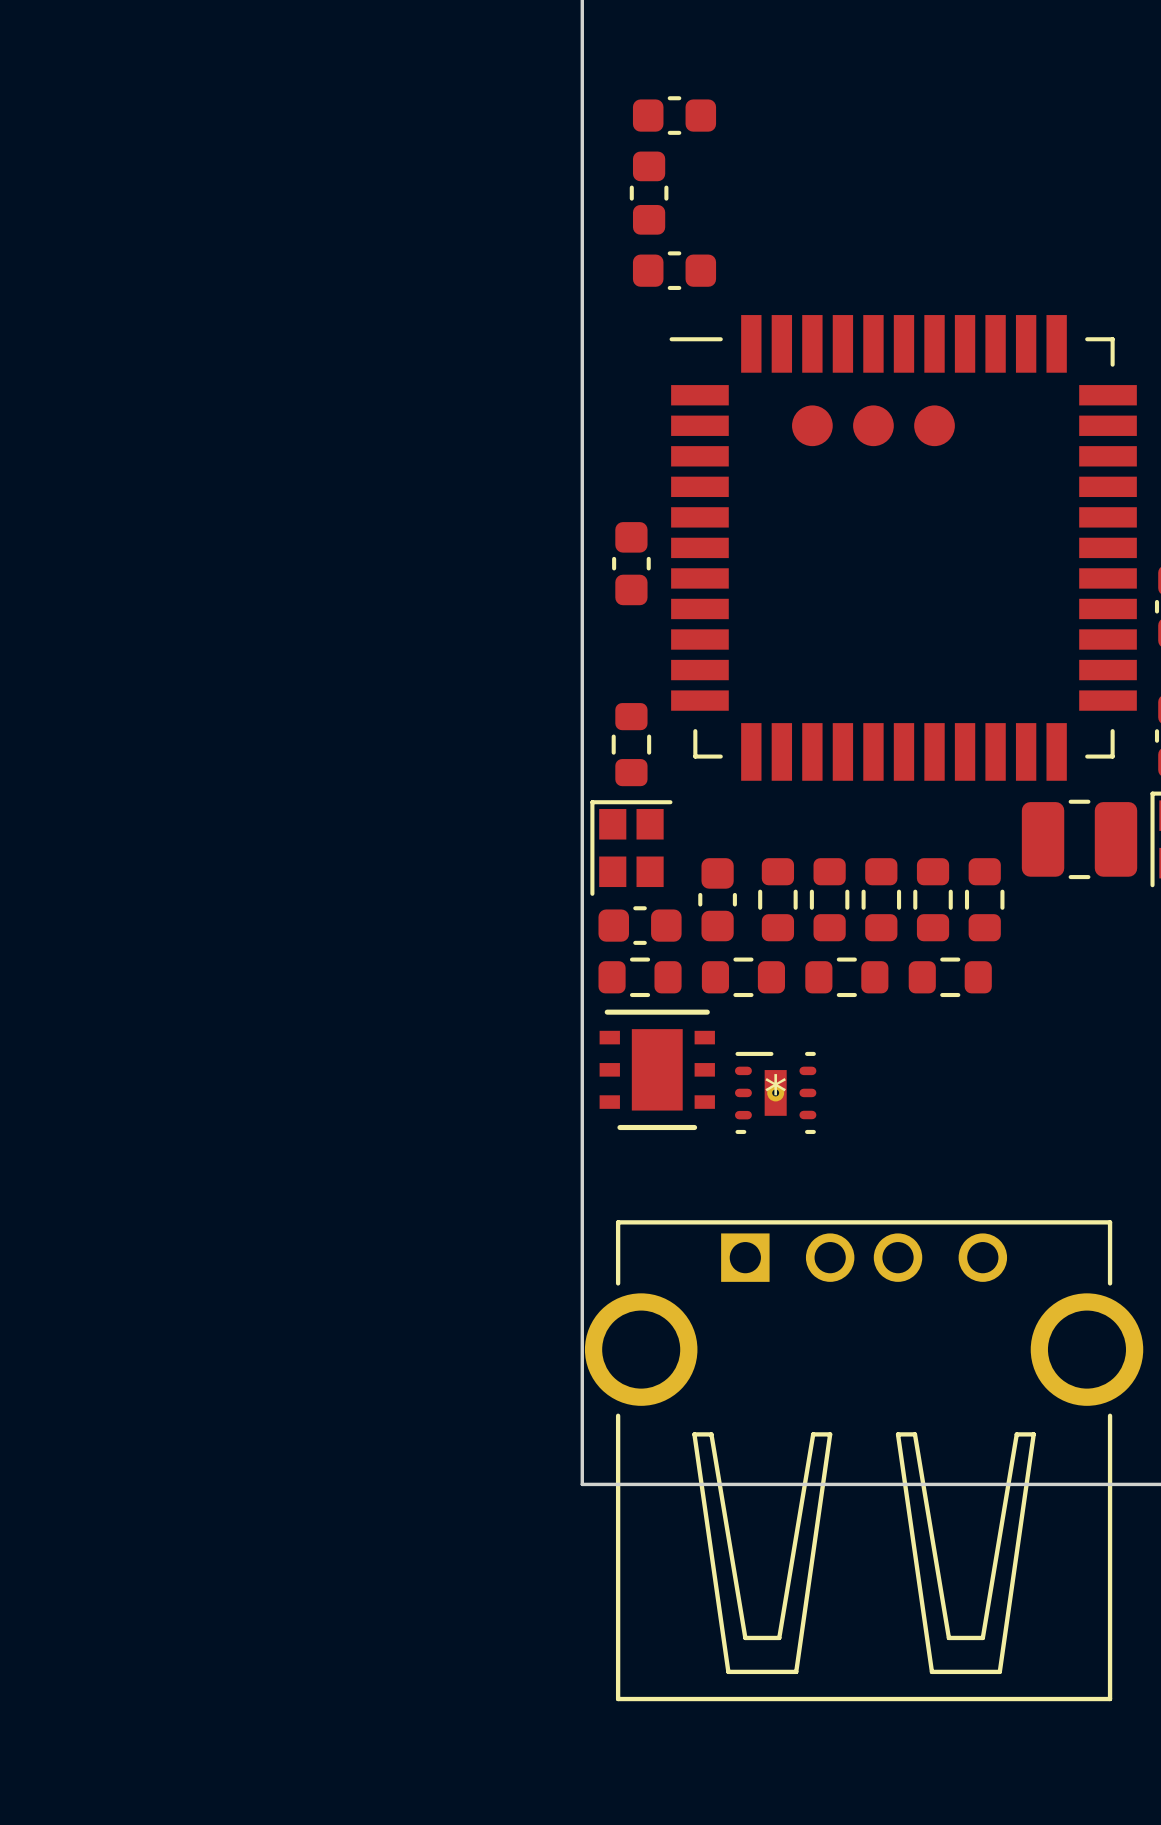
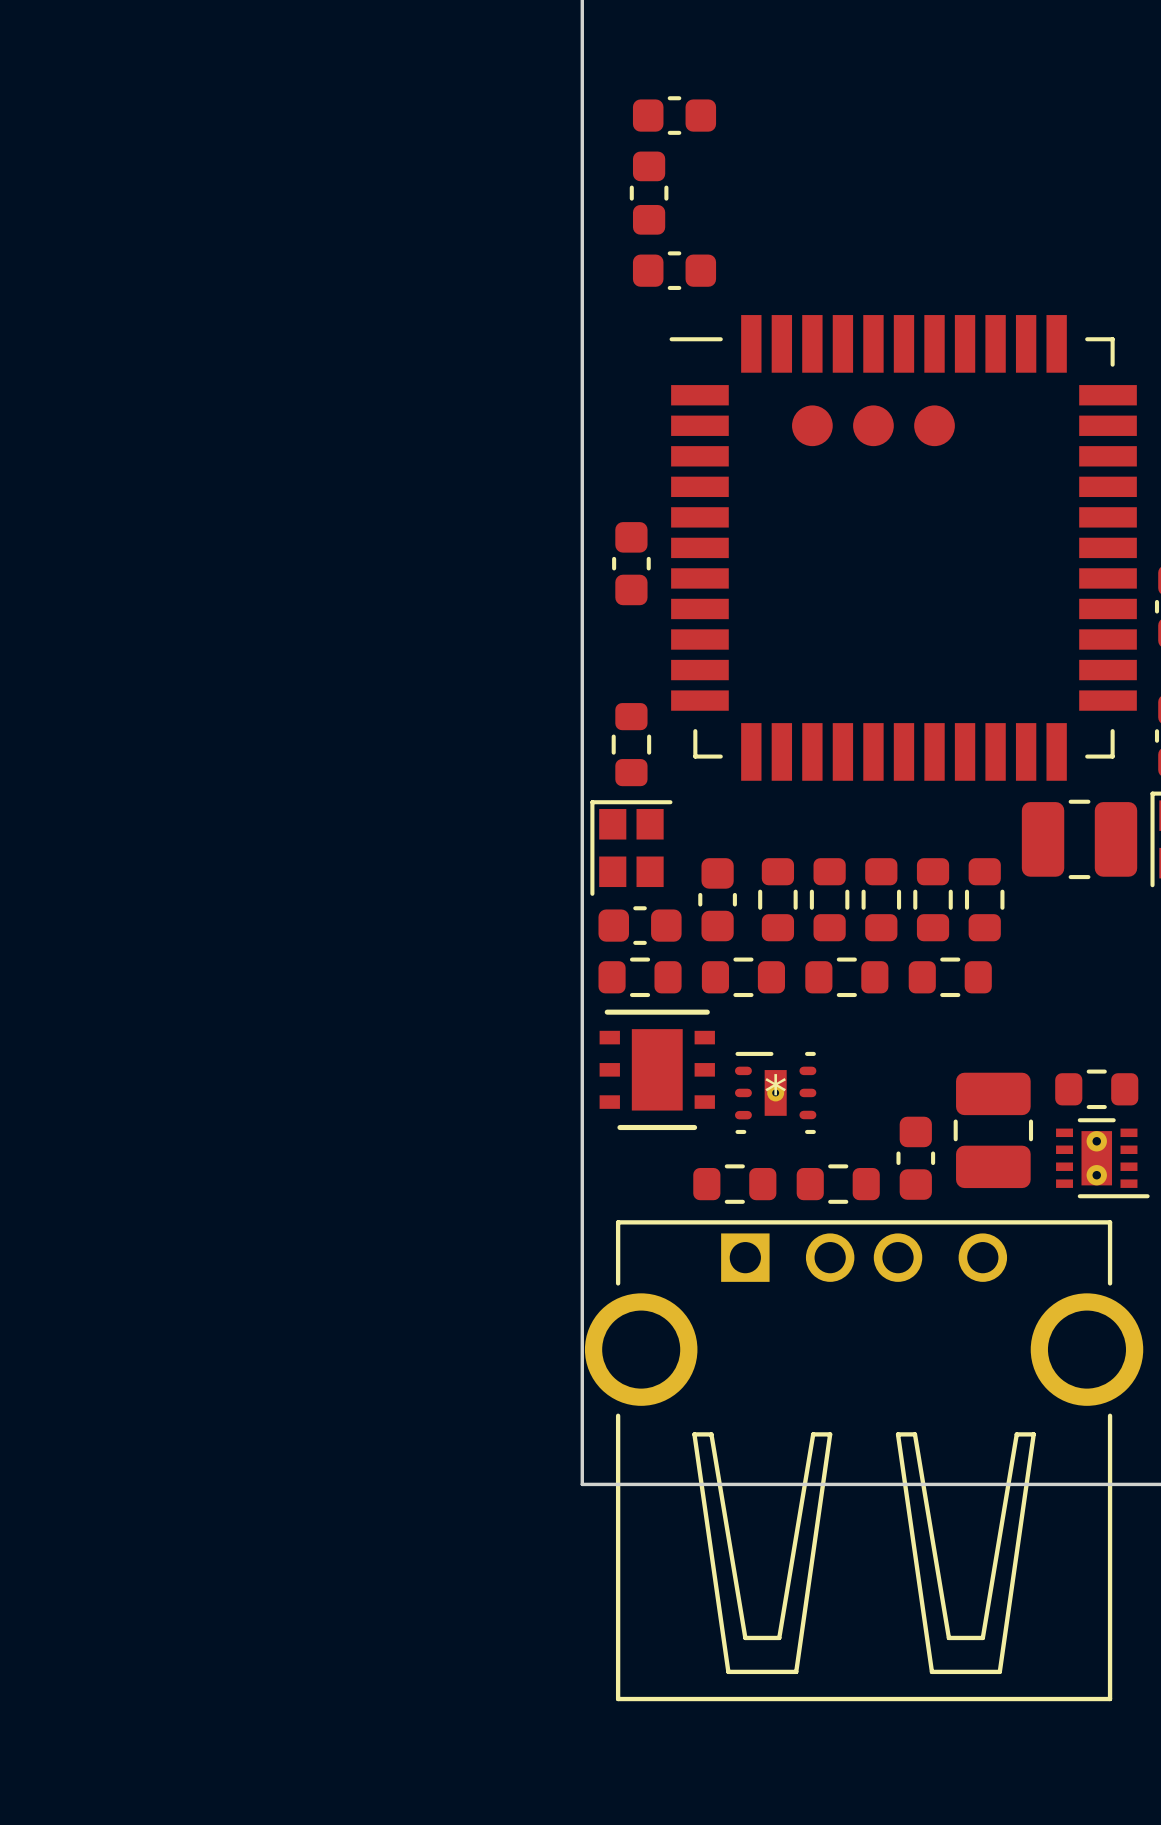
part: none -> (1096, 1089)
part: none -> (993, 1130)
part: none -> (915, 1158)
part: none -> (1102, 1158)
part: none -> (734, 1184)
part: none -> (838, 1184)

